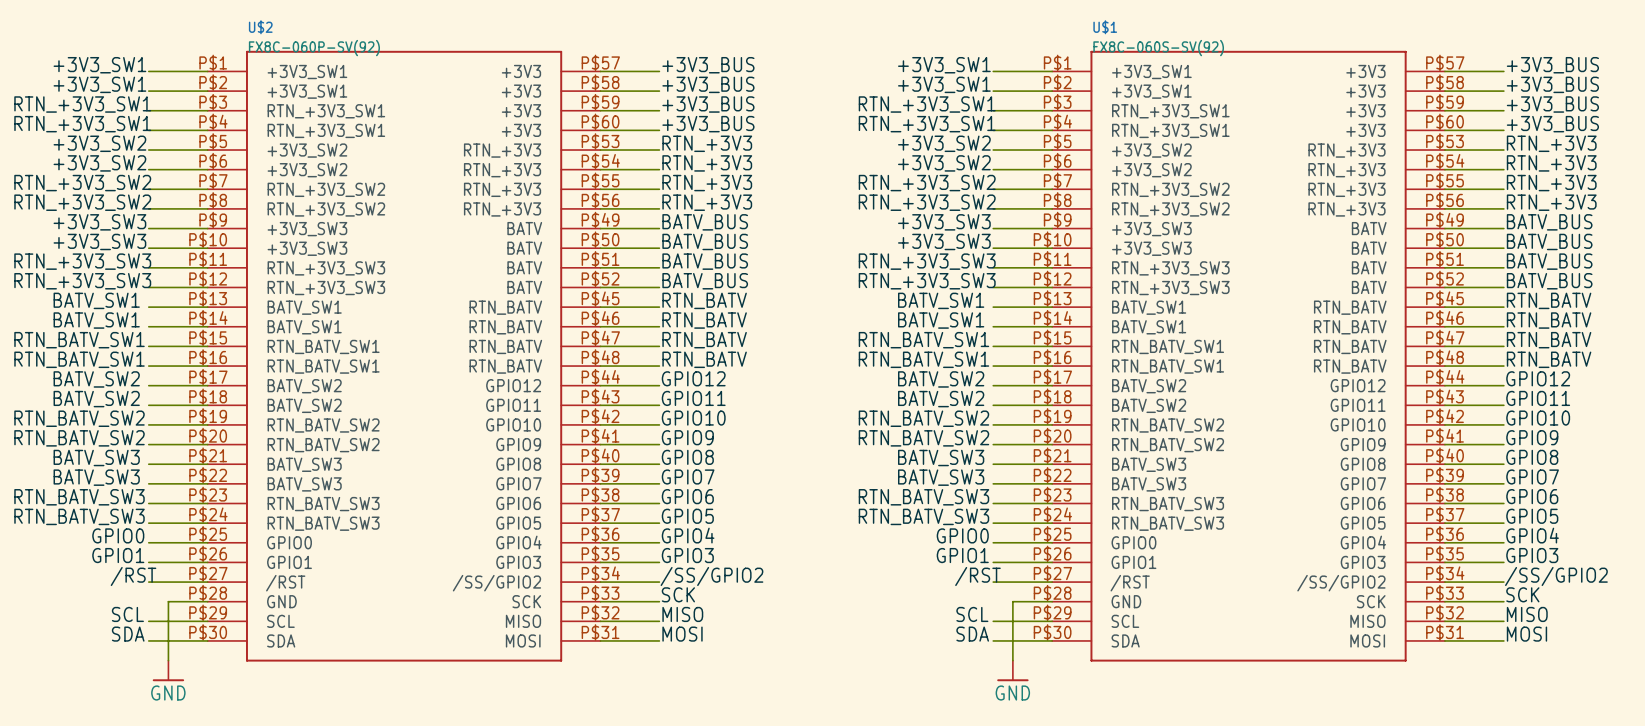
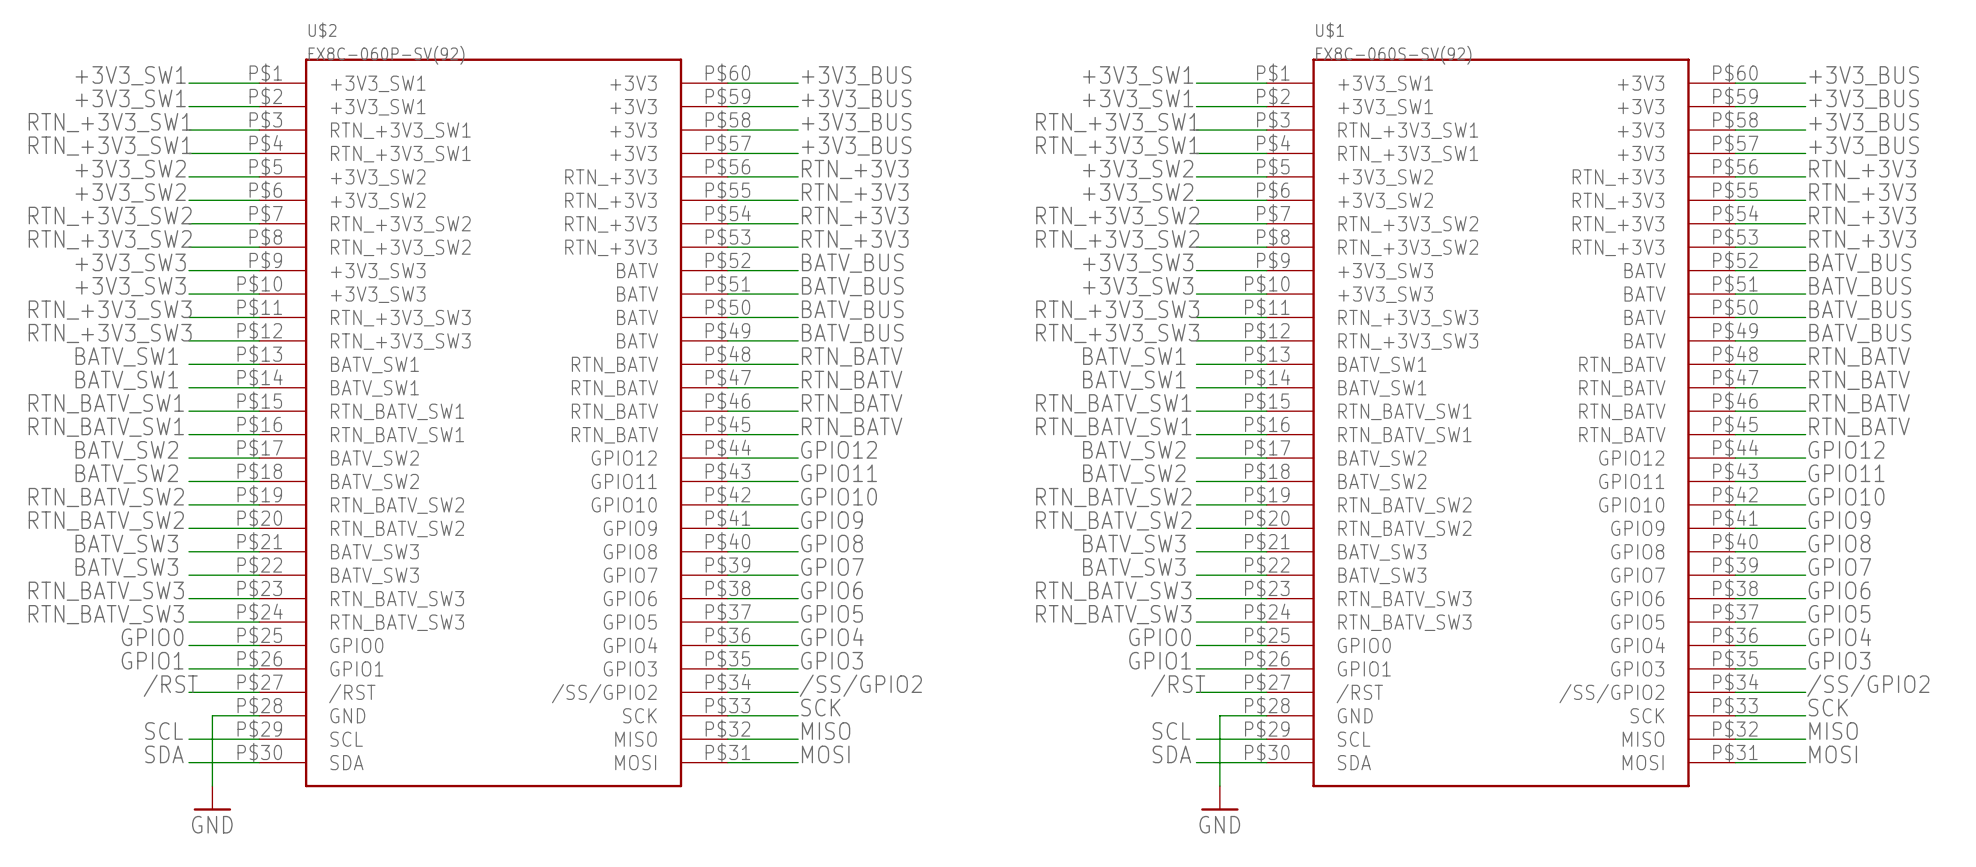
U$2 symbol: [207, 50, 601, 662] -> [259, 58, 728, 788]
U$1 symbol: [1052, 50, 1445, 662] -> [1266, 58, 1736, 788]

